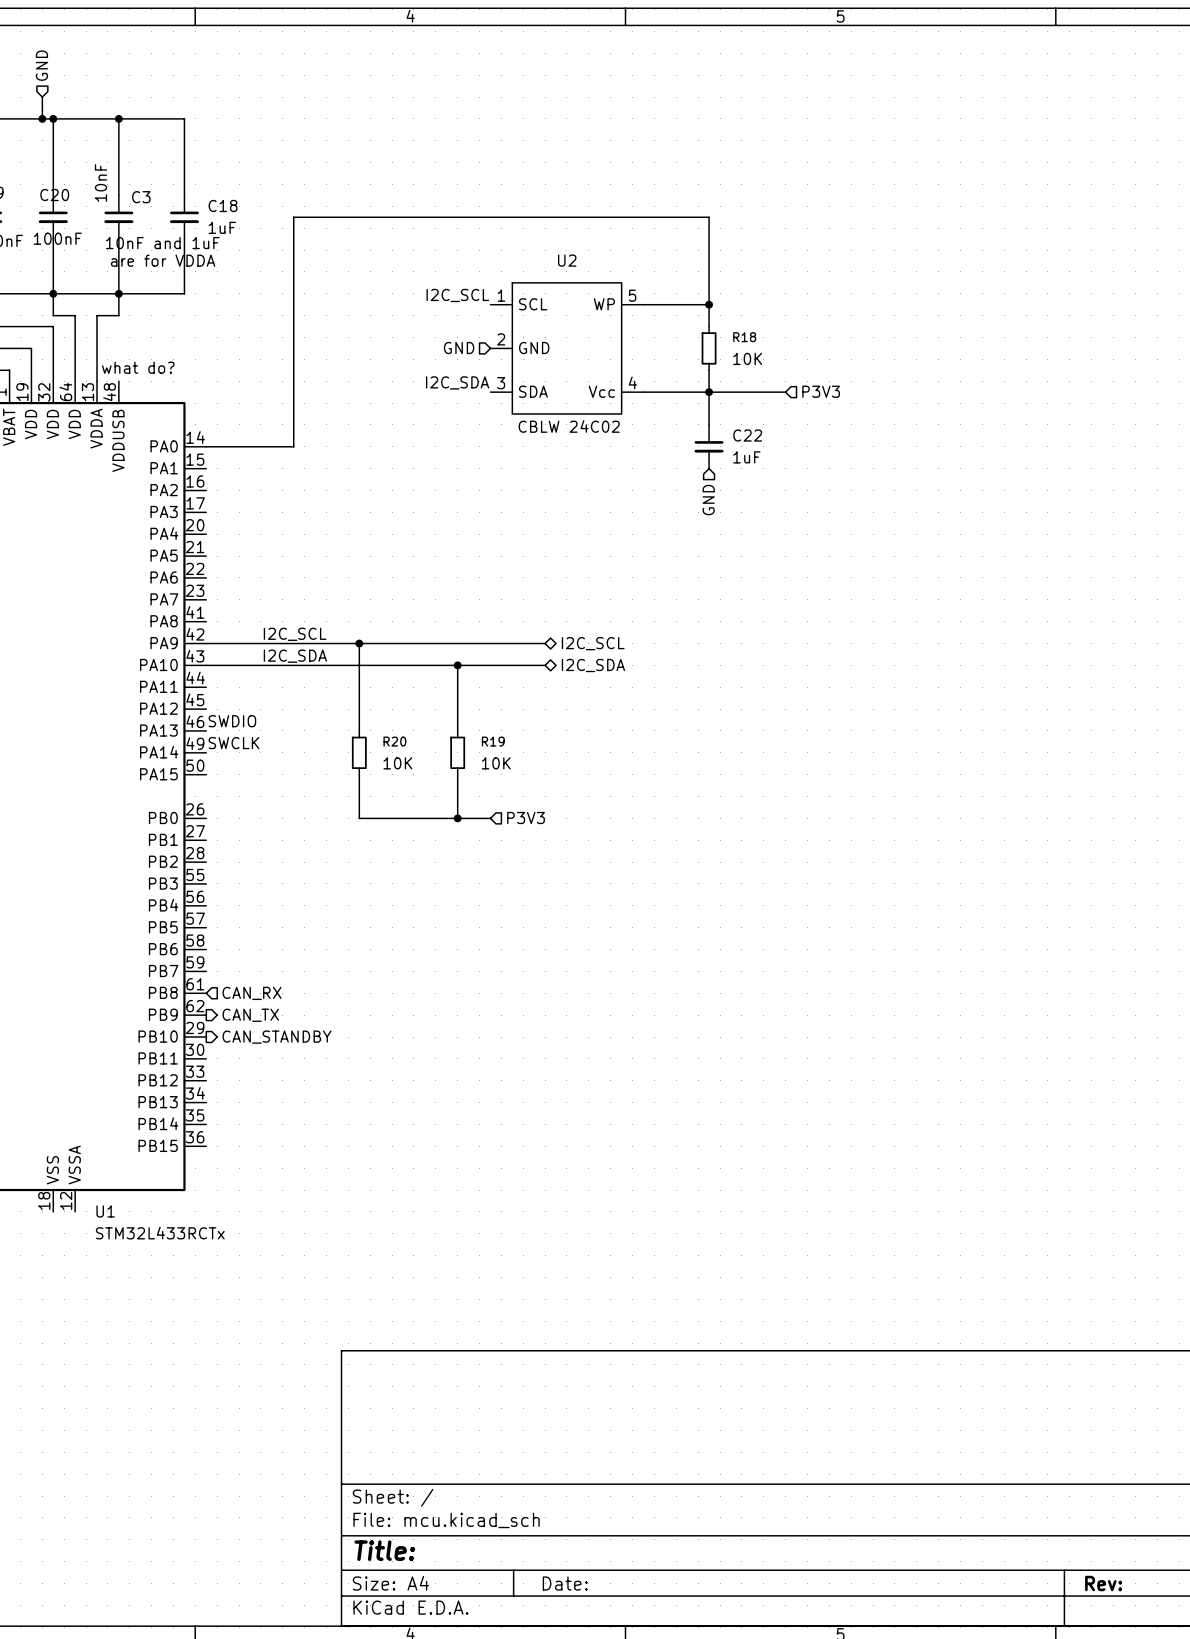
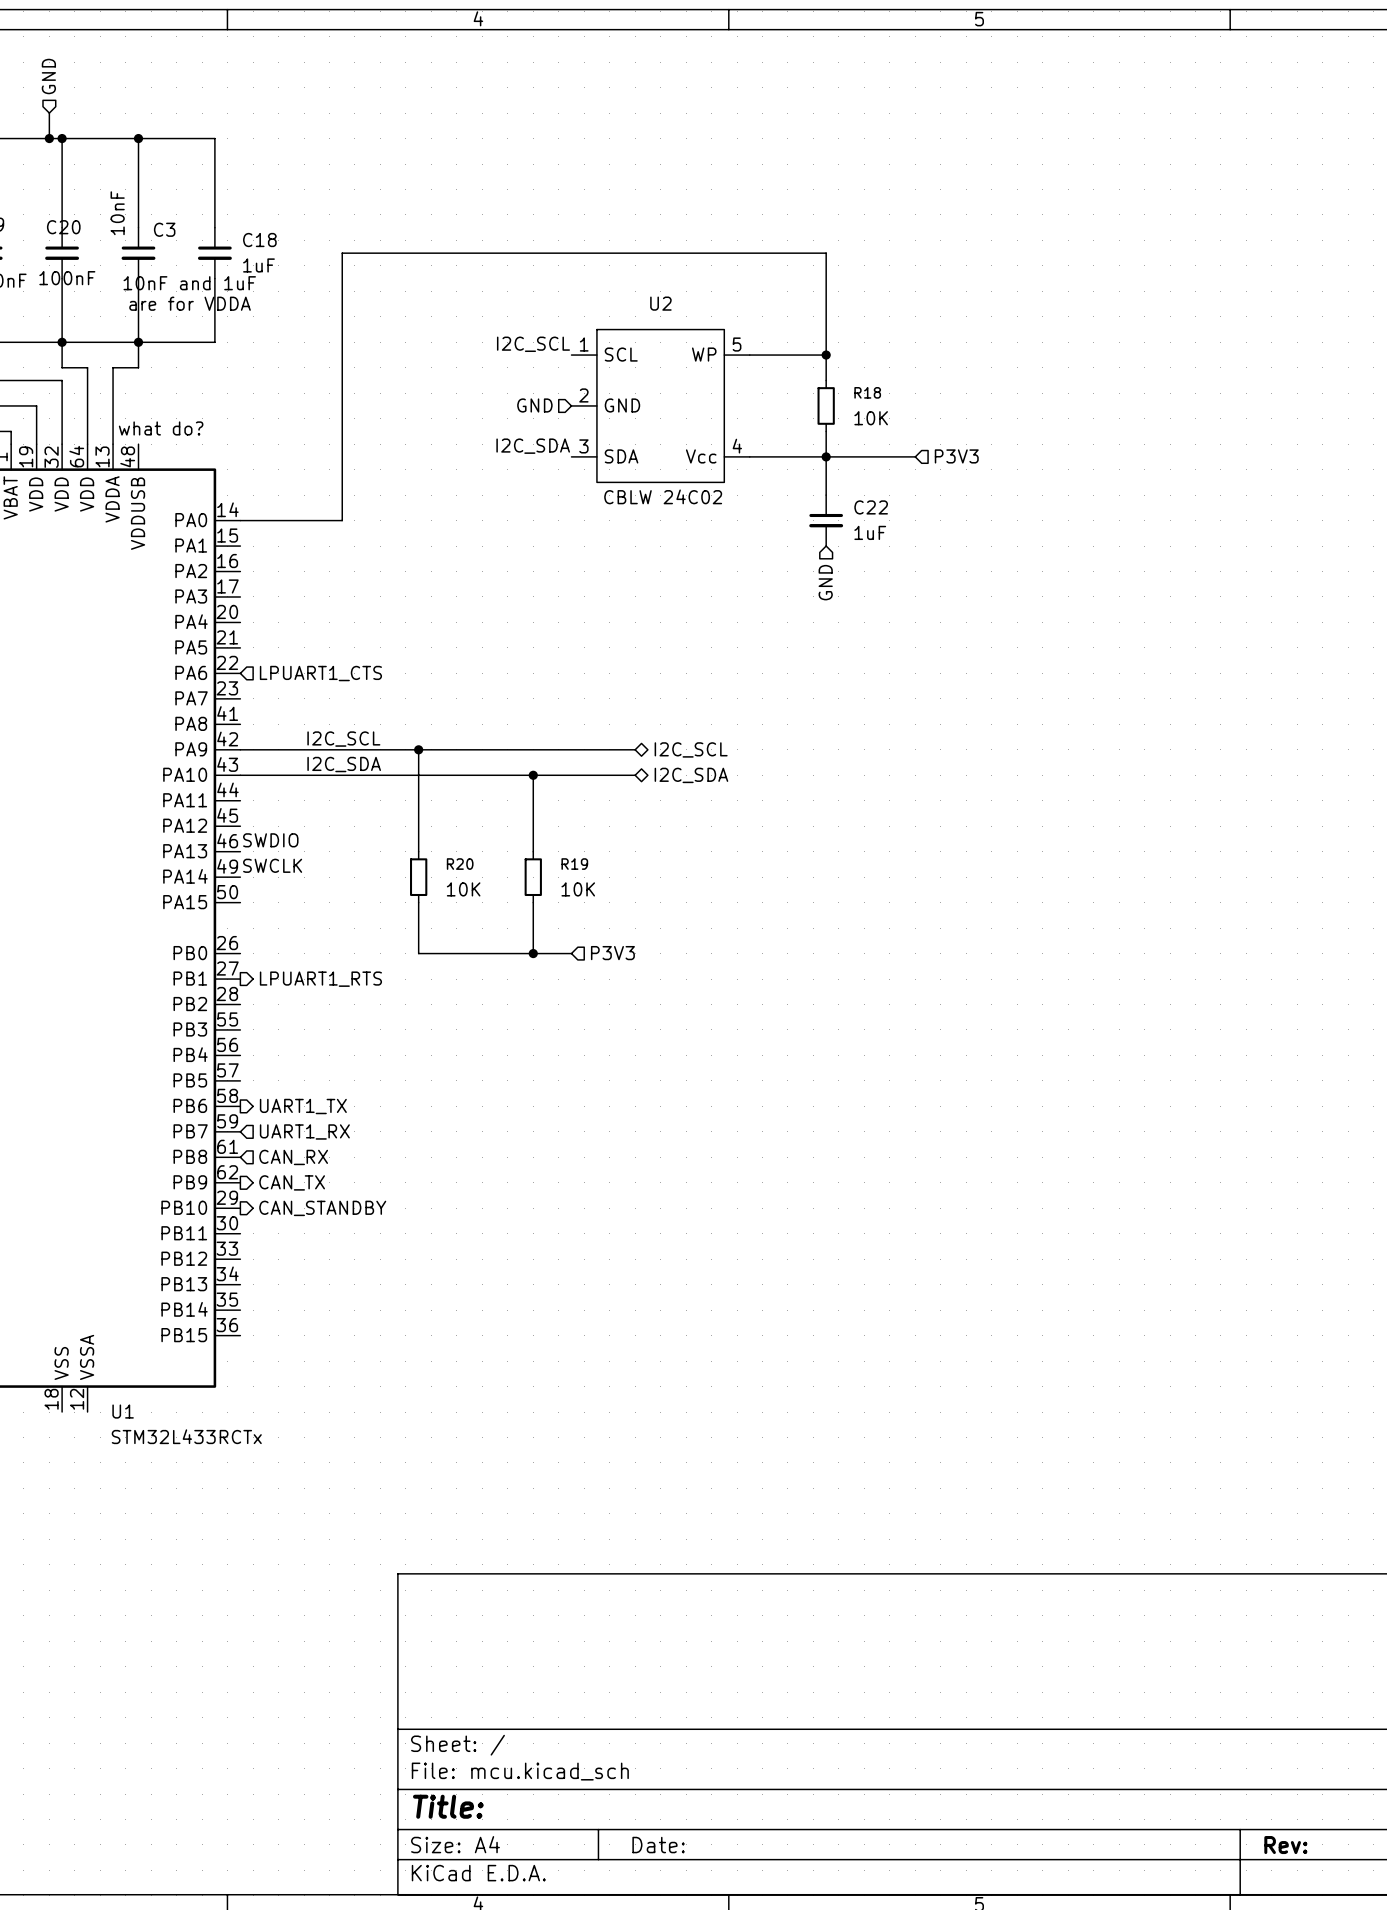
hierarchical label: none -> LPUART1_CTS (320, 673)
hierarchical label: none -> LPUART1_RTS (320, 979)
hierarchical label: none -> UART1_TX (303, 1106)
hierarchical label: none -> UART1_RX (304, 1131)

